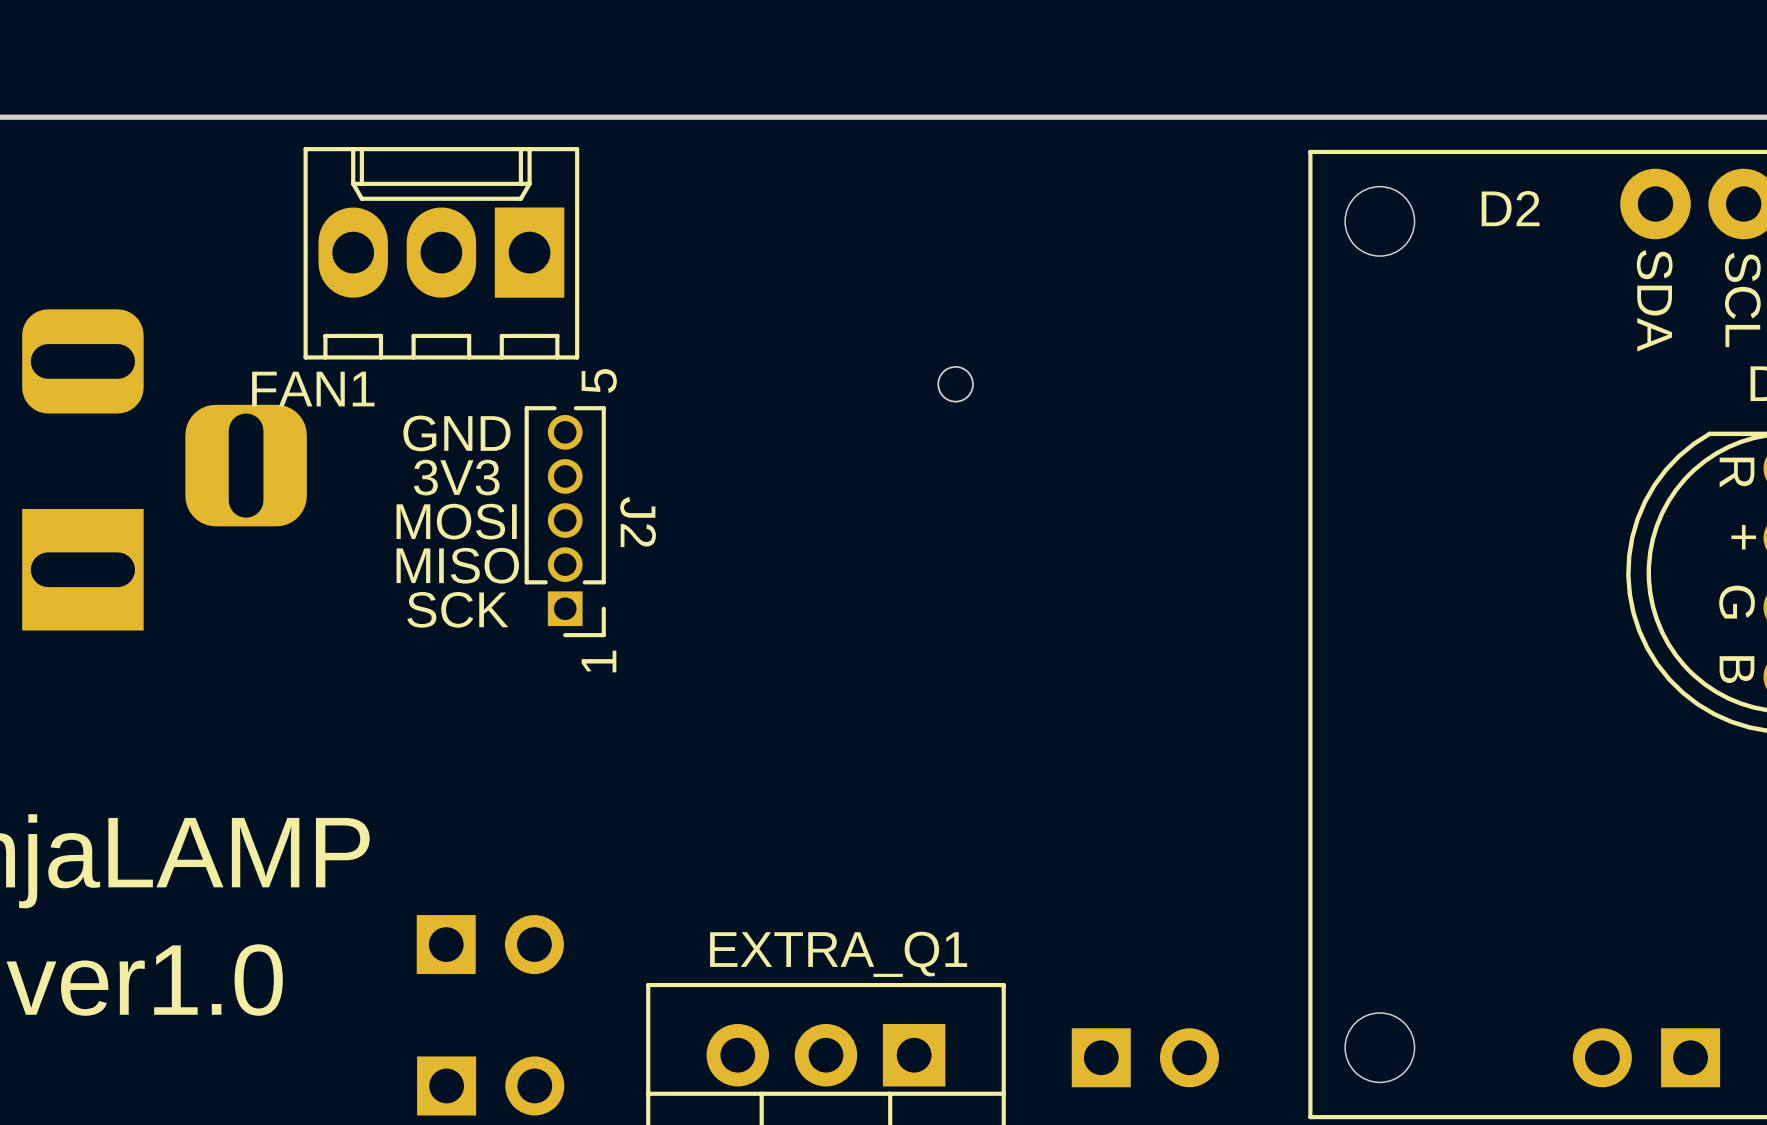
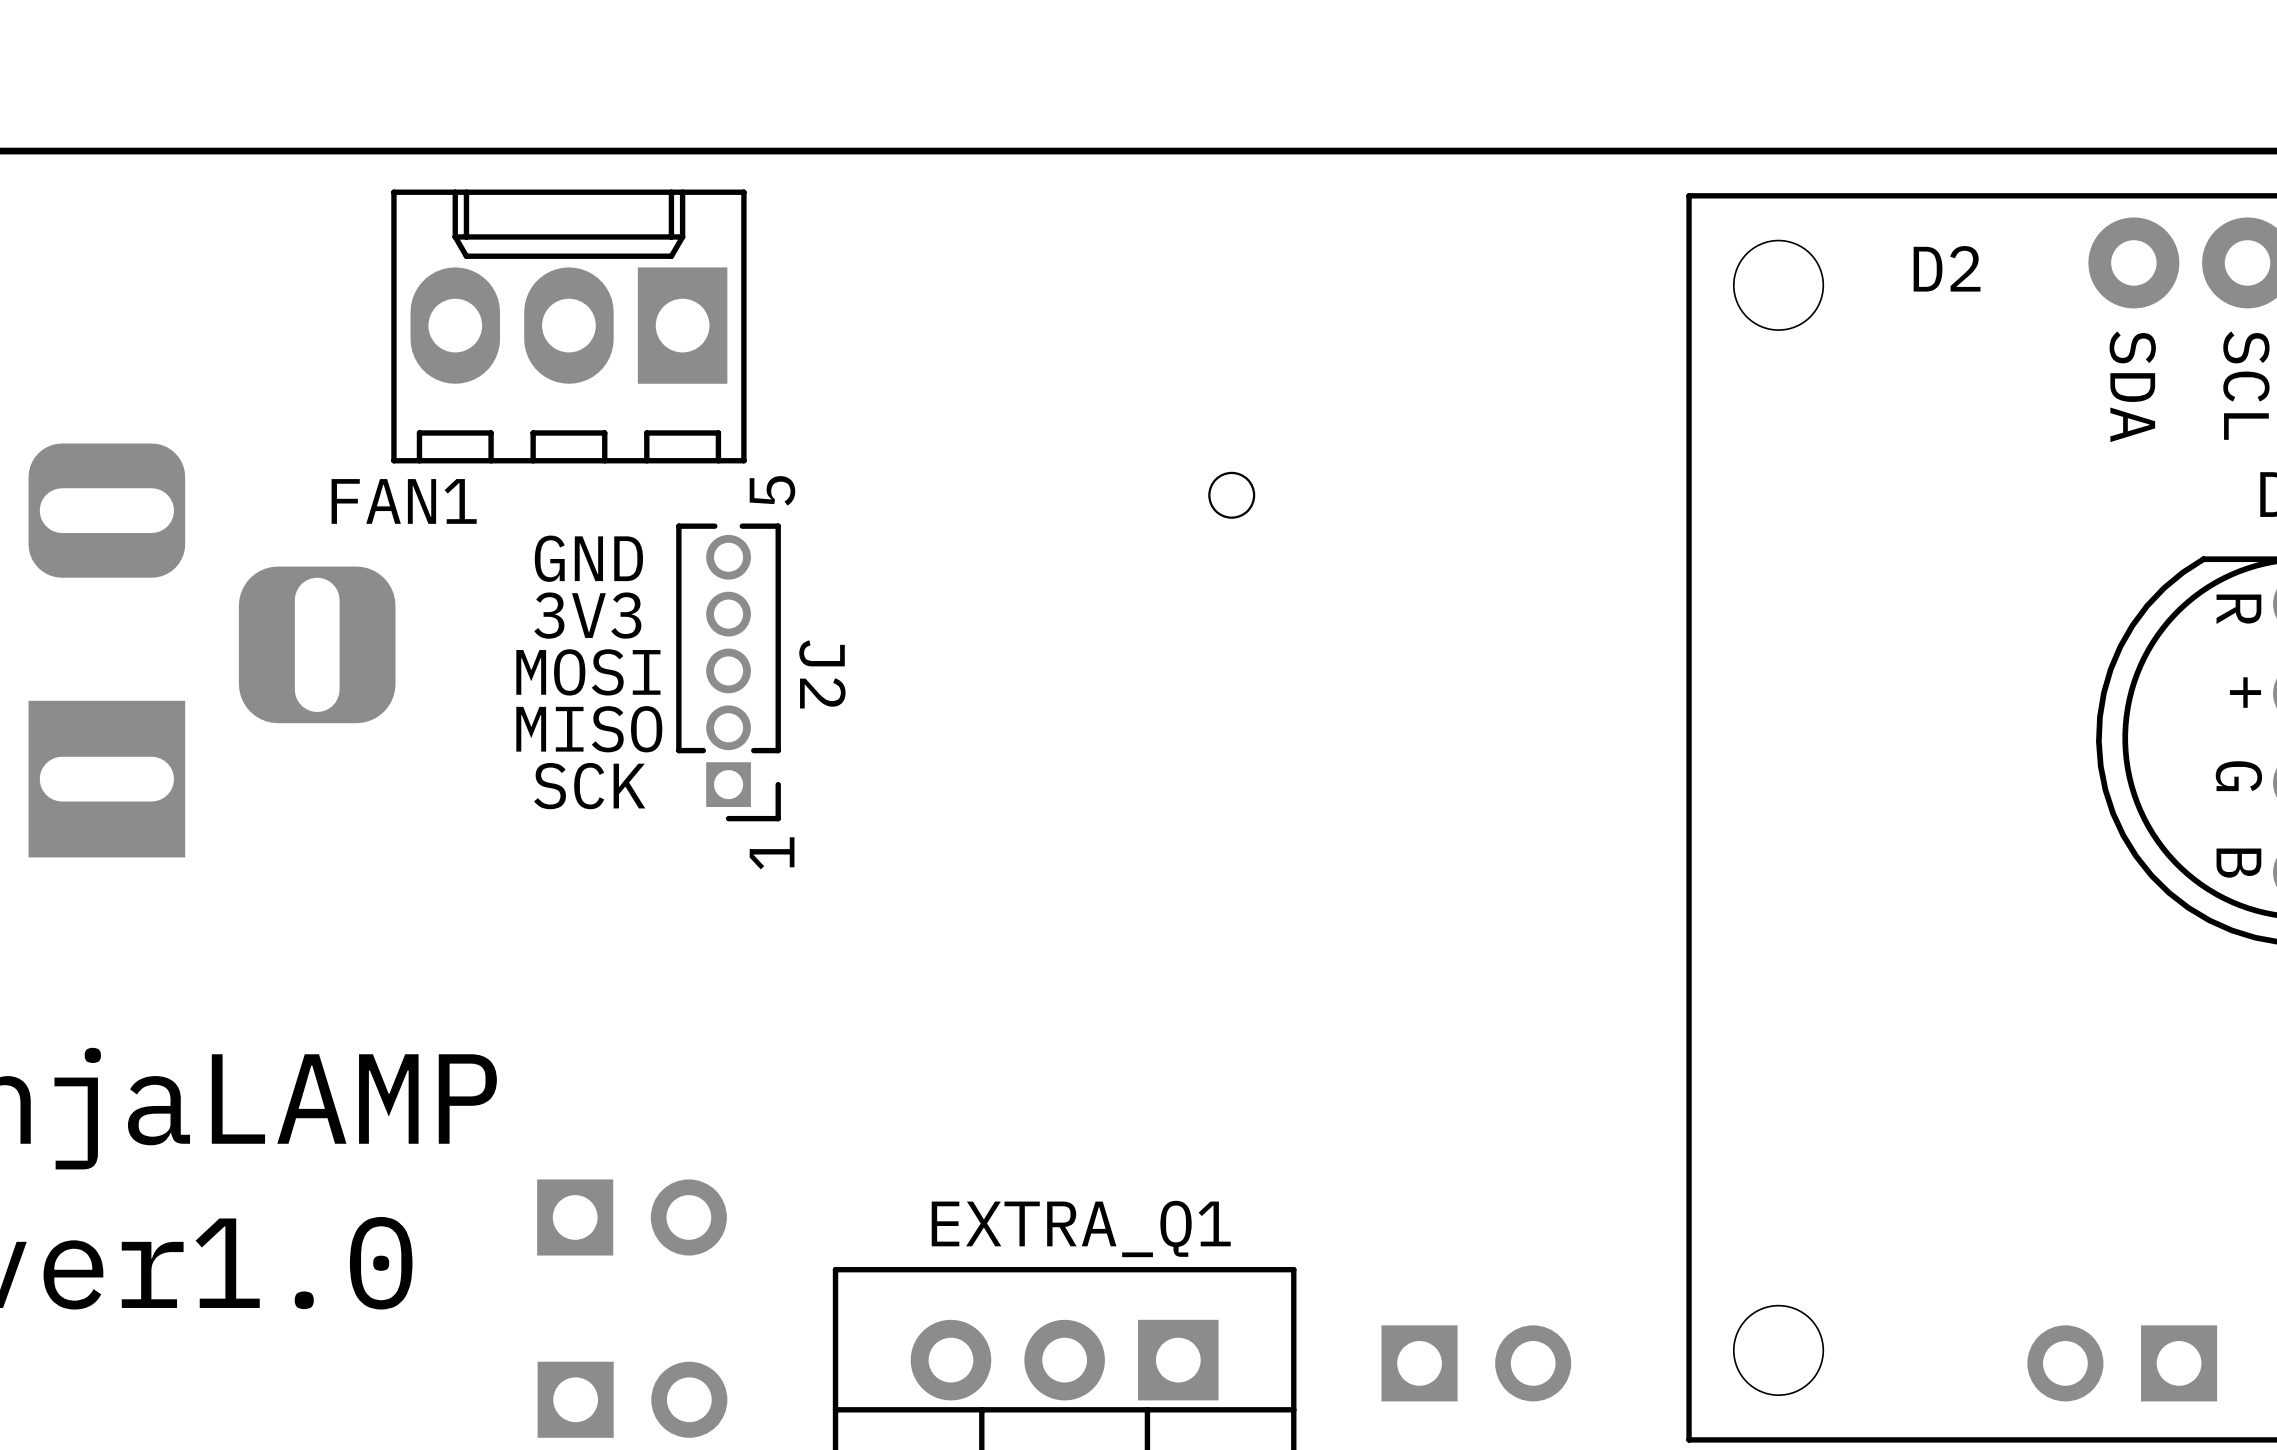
part position: (164, 469) -> (212, 650)

